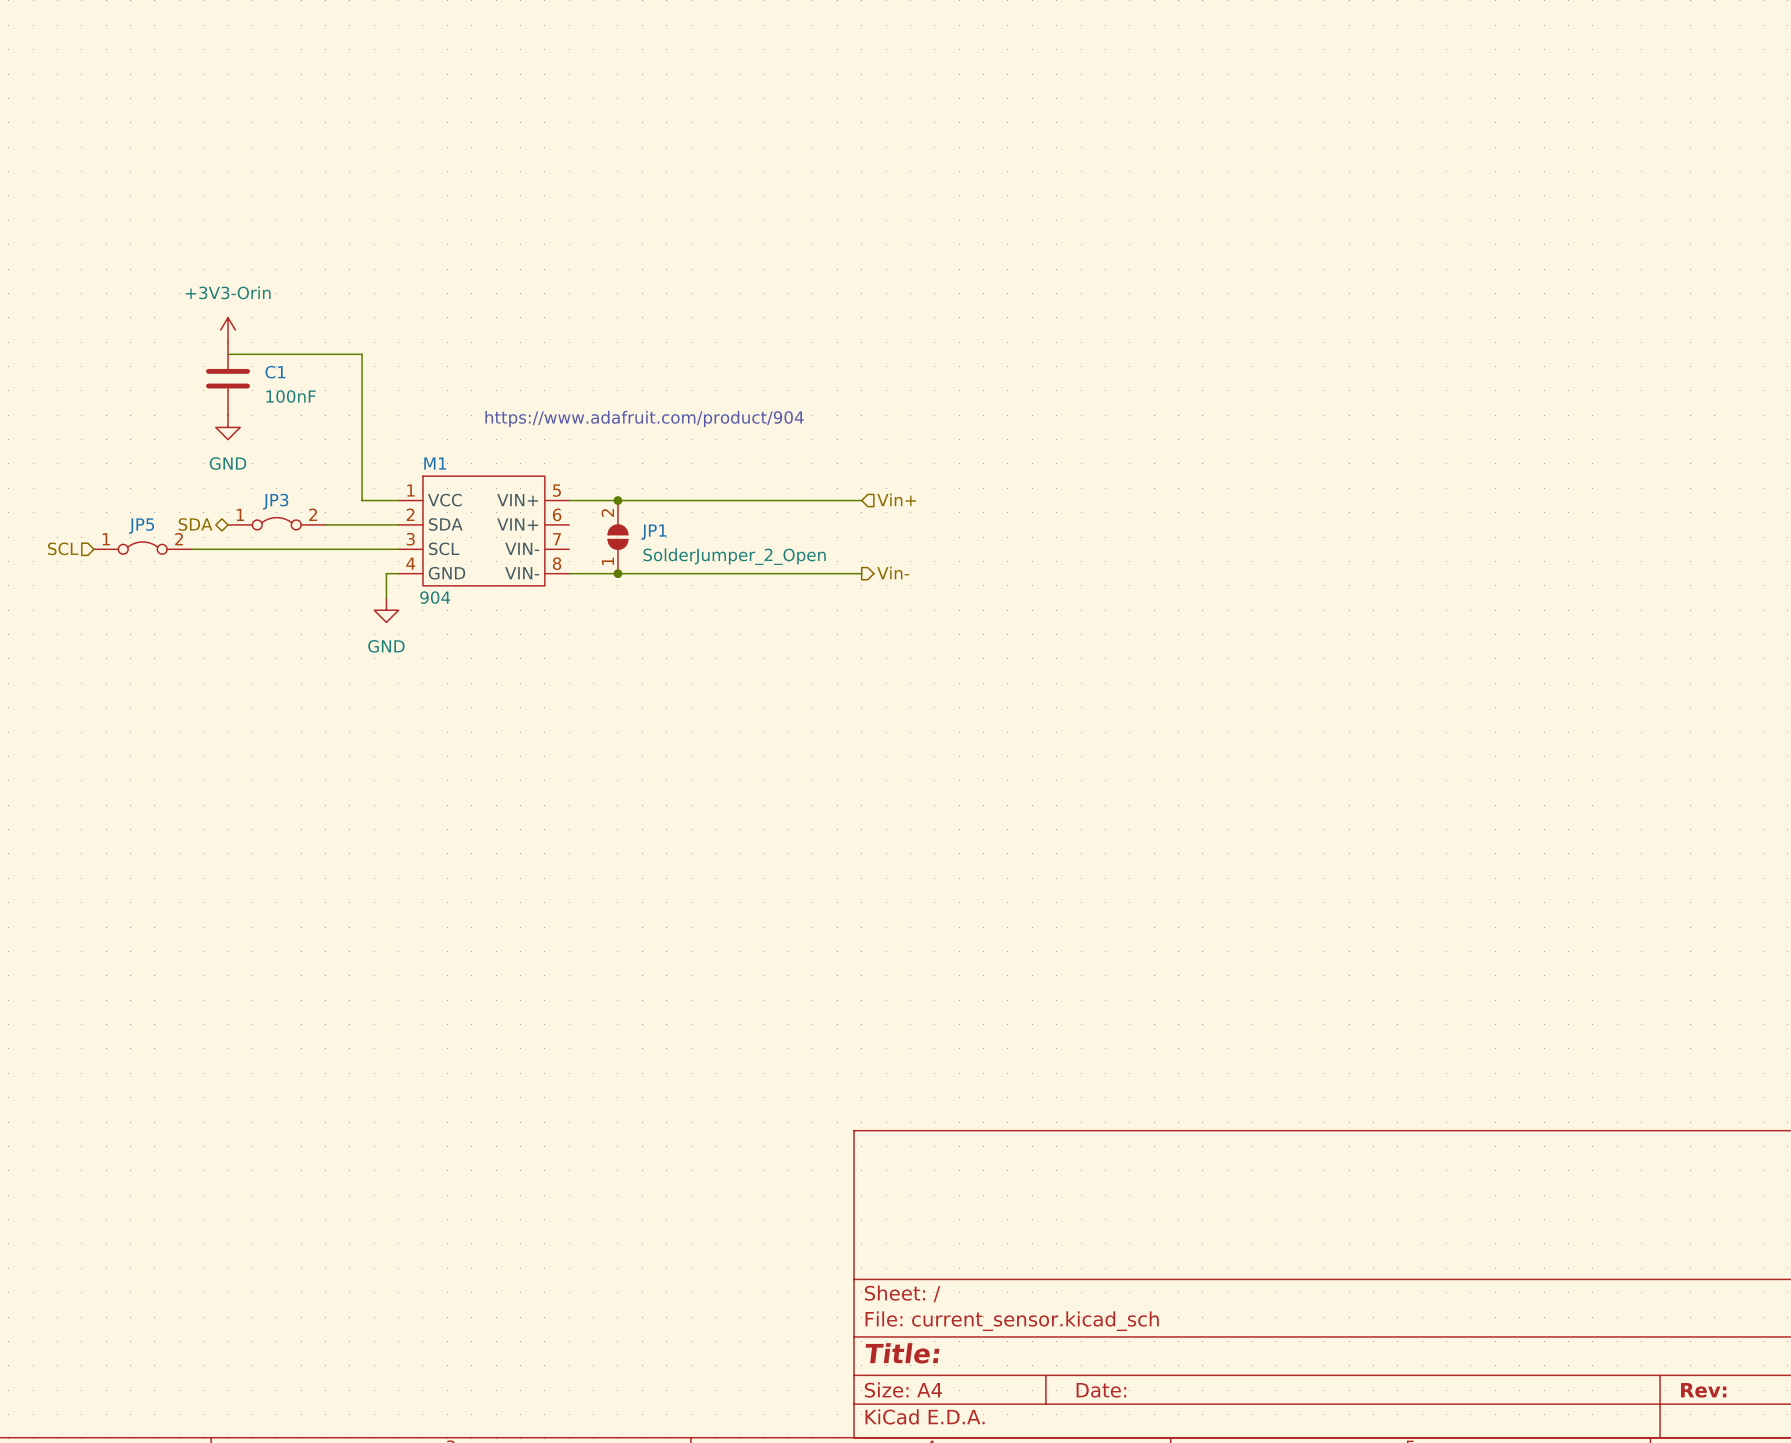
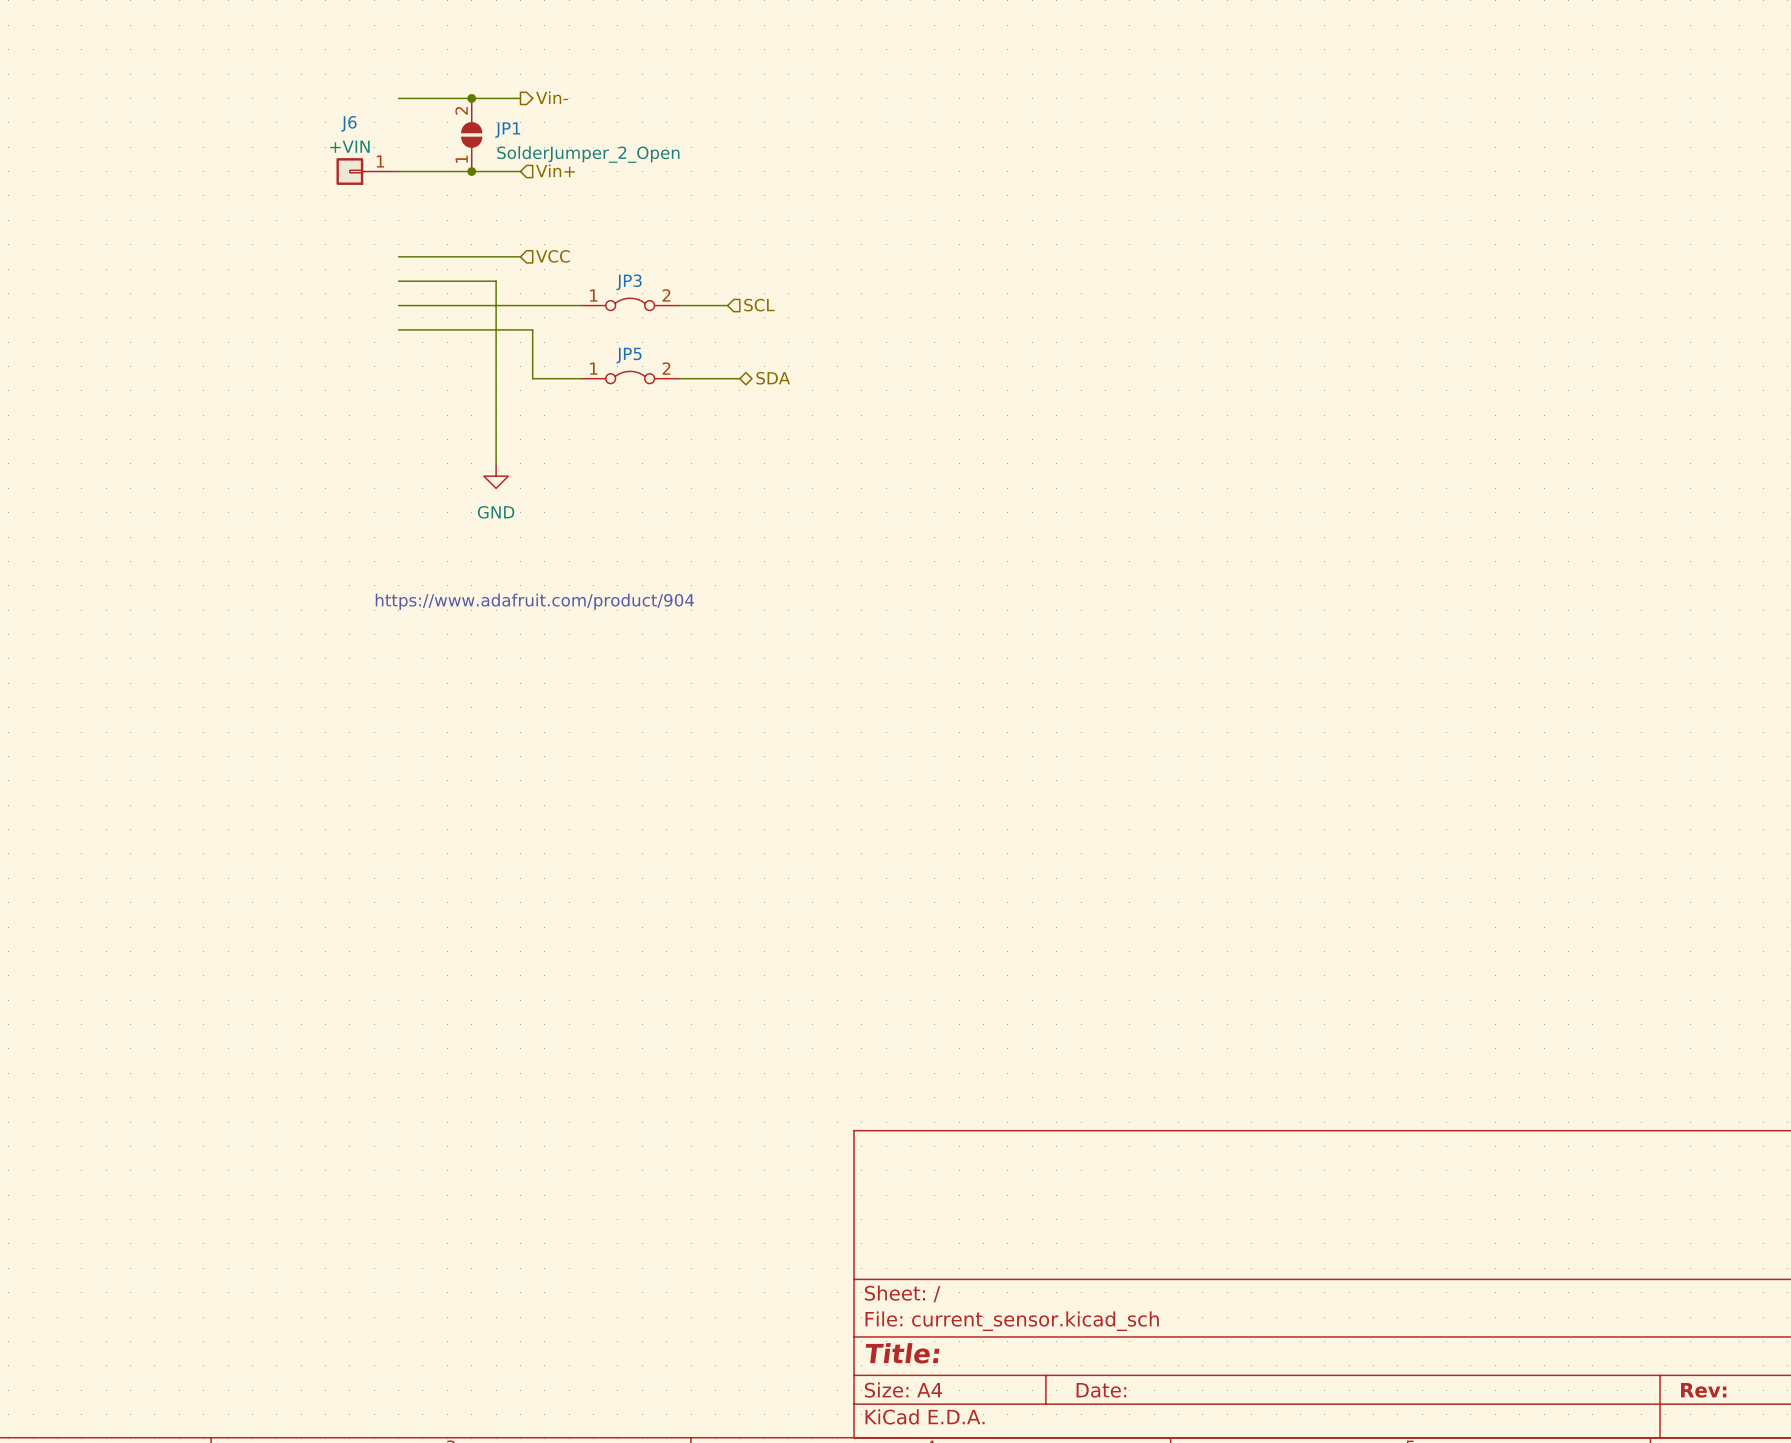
hierarchical label: none -> Vin- (551, 97)
wire: none -> (398, 98) (520, 98)
junction: none -> (471, 98)
hierarchical label: none -> Vin+ (555, 170)
J6: none -> +VIN (367, 171)
wire: none -> (398, 171) (520, 171)
junction: none -> (471, 171)
wire: none -> (398, 256) (520, 256)
hierarchical label: none -> VCC (552, 256)
wire: none -> (398, 281) (496, 281) (496, 463)
wire: none -> (398, 305) (581, 305)
wire: none -> (678, 305) (727, 305)
hierarchical label: none -> SCL (759, 305)
power symbol: +3V3-Orin (228, 329) -> none
wire: none -> (398, 329) (532, 329) (532, 378) (581, 378)
wire: (228, 354) (362, 354) (362, 500) (398, 500) -> none
C1: 100nF (228, 378) -> none
wire: none -> (678, 378) (739, 378)
hierarchical label: none -> SDA (773, 378)
text position: https://www.adafruit.com/product/904 (644, 418) -> https://www.adafruit.com/product/904 (534, 601)
power symbol: GND (228, 427) -> none
power symbol: none -> GND (496, 476)
hierarchical label: Vin+ (896, 499) -> none
wire: (569, 500) (861, 500) -> none
junction: (617, 500) -> none
JP3 position: (276, 523) -> (630, 304)
hierarchical label: SDA (195, 524) -> none
wire: (325, 524) (398, 524) -> none
M1: 904 (483, 531) -> none
JP1 position: (617, 537) -> (471, 134)
hierarchical label: SCL (63, 548) -> none
JP5 position: (142, 548) -> (630, 377)
wire: (191, 549) (398, 549) -> none
hierarchical label: Vin- (893, 572) -> none
wire: (398, 573) (386, 573) (386, 598) -> none
wire: (569, 573) (861, 573) -> none
junction: (617, 573) -> none
power symbol: GND (386, 610) -> none

